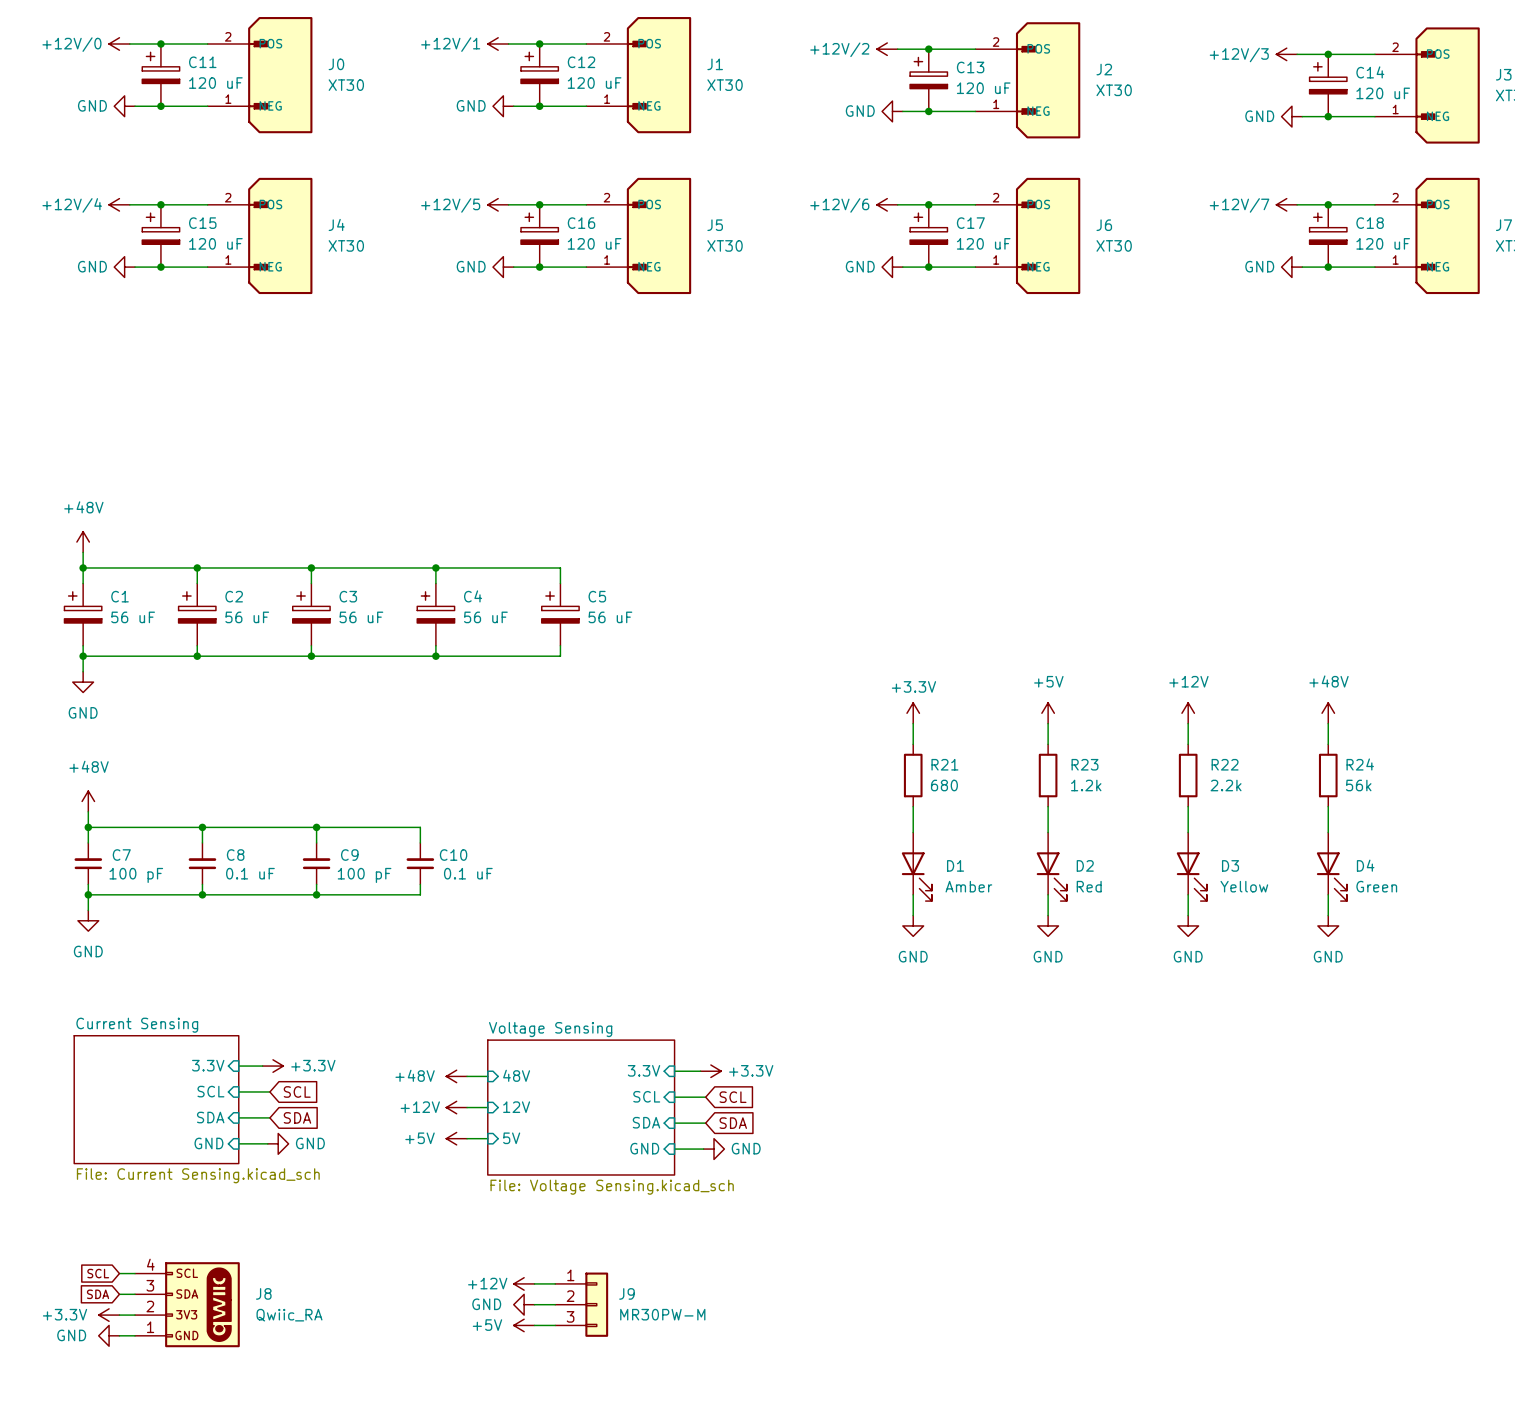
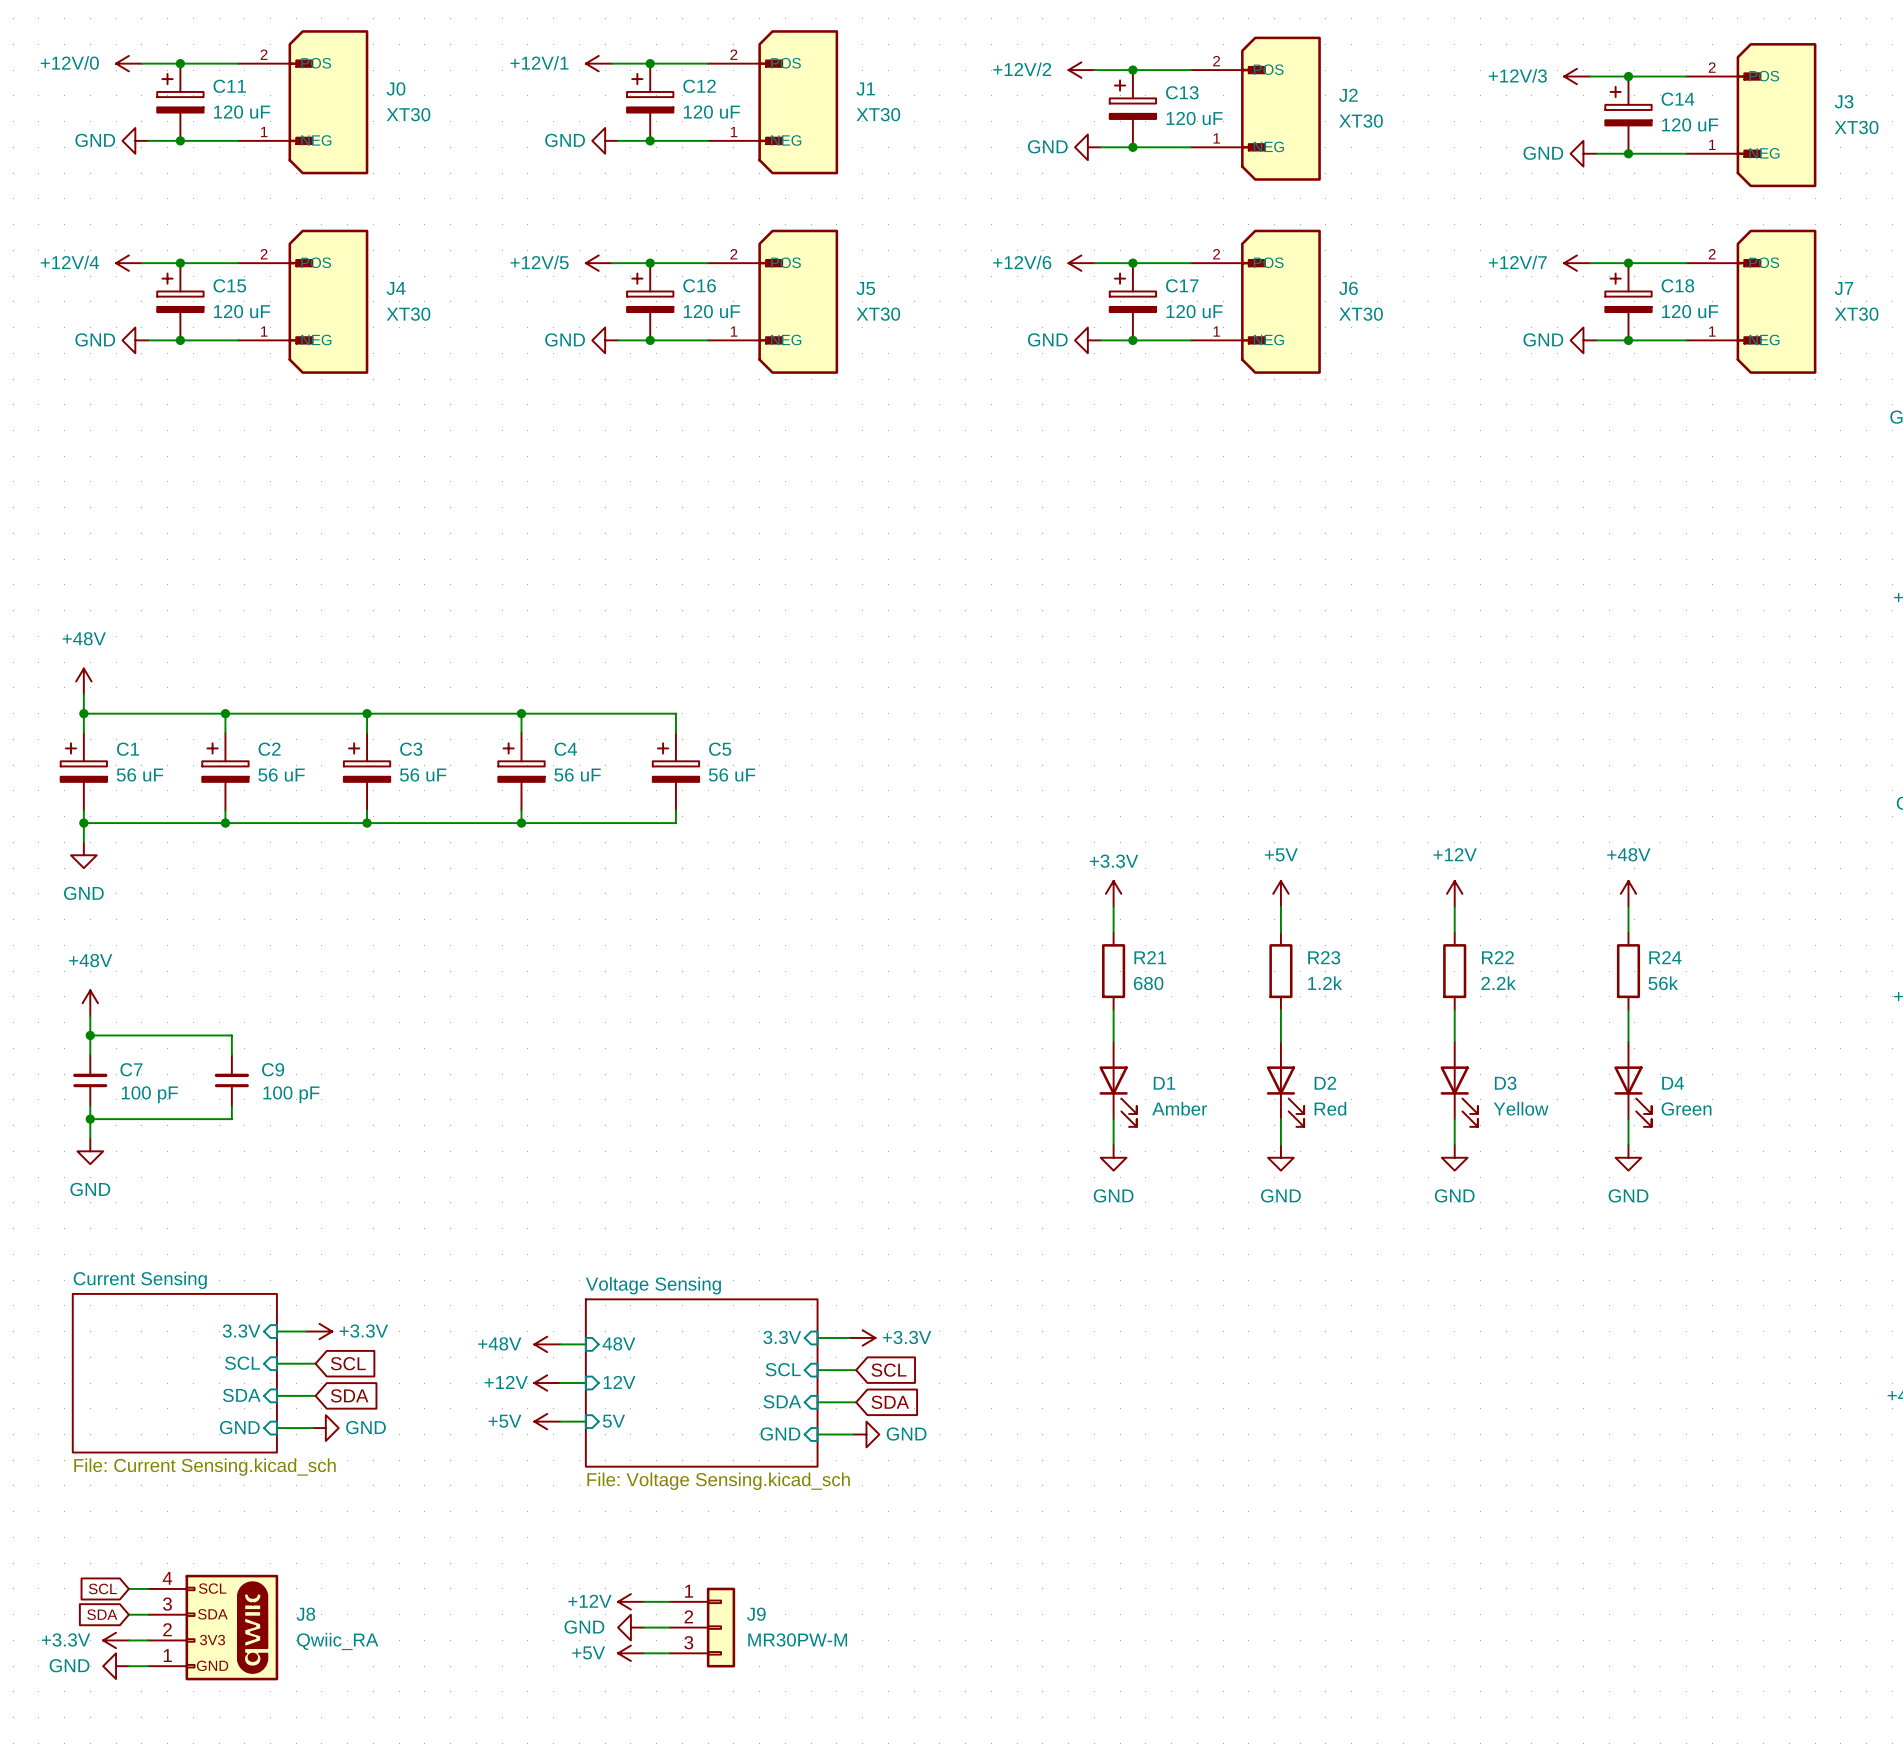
wire: (202, 827) (420, 827) (420, 842) -> none
junction: (202, 827) -> none
wire: (316, 827) (316, 842) -> none
junction: (316, 827) -> none
C8 name: C8 (235, 855) -> C9 (273, 1069)
C9: 100 pF (316, 863) -> none
C10: 0.1 uF (420, 863) -> none
C8 value: 0.1 uF (250, 873) -> 100 pF (291, 1094)
wire: (316, 884) (316, 894) -> none
wire: (420, 884) (420, 894) (202, 894) -> none
junction: (202, 894) -> none
junction: (316, 894) -> none

